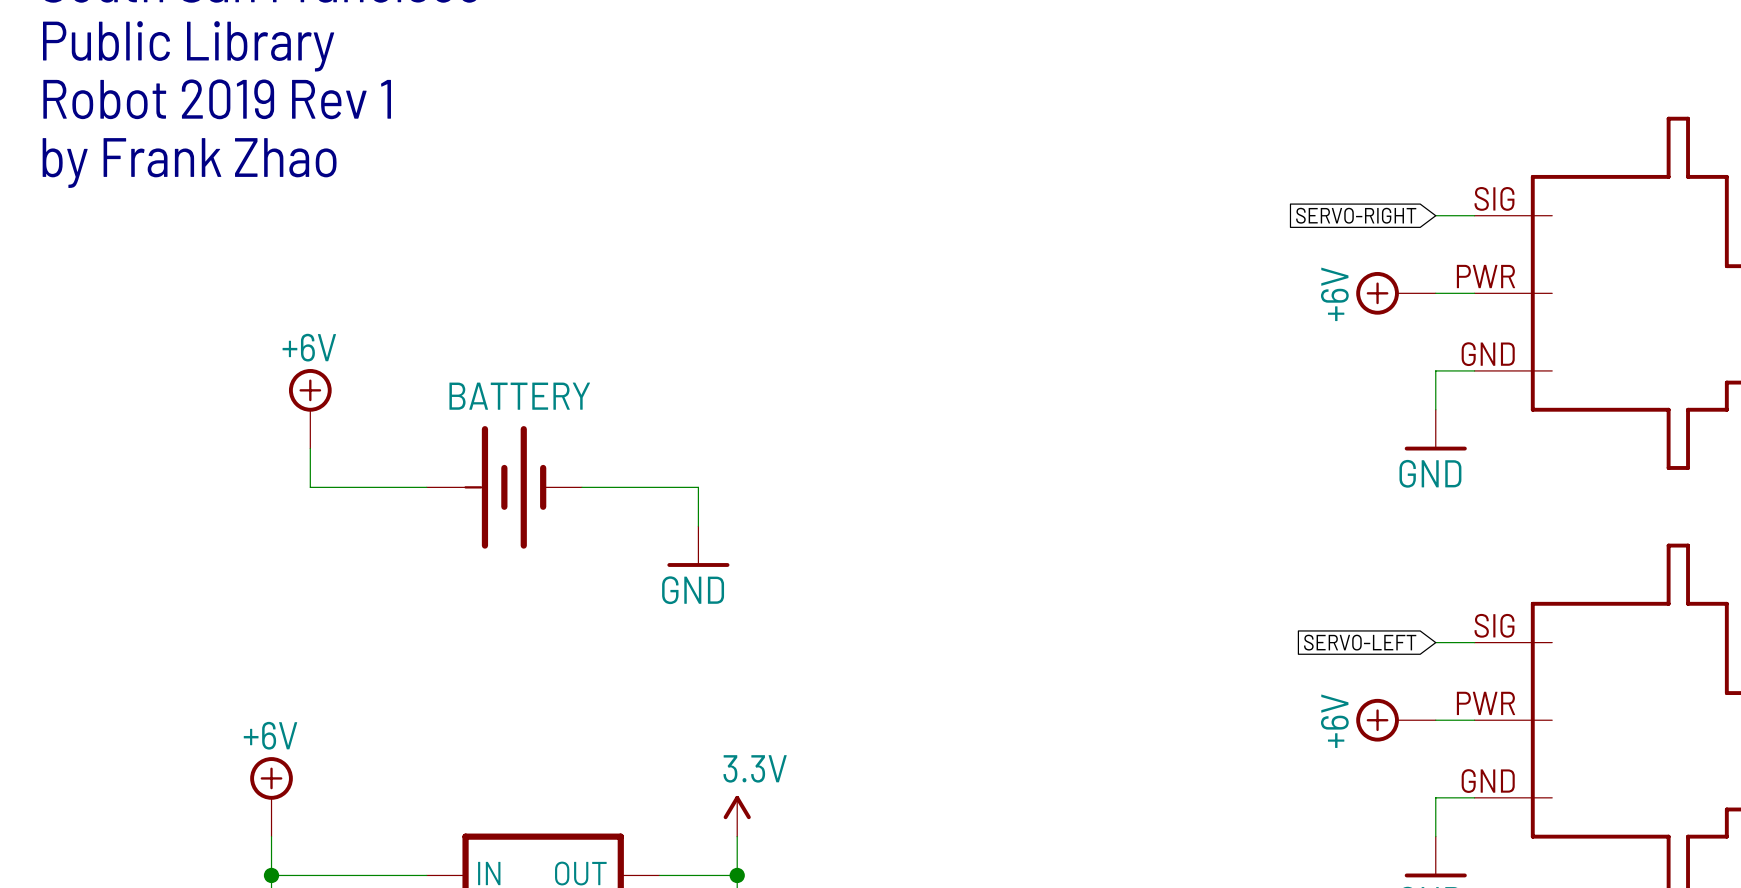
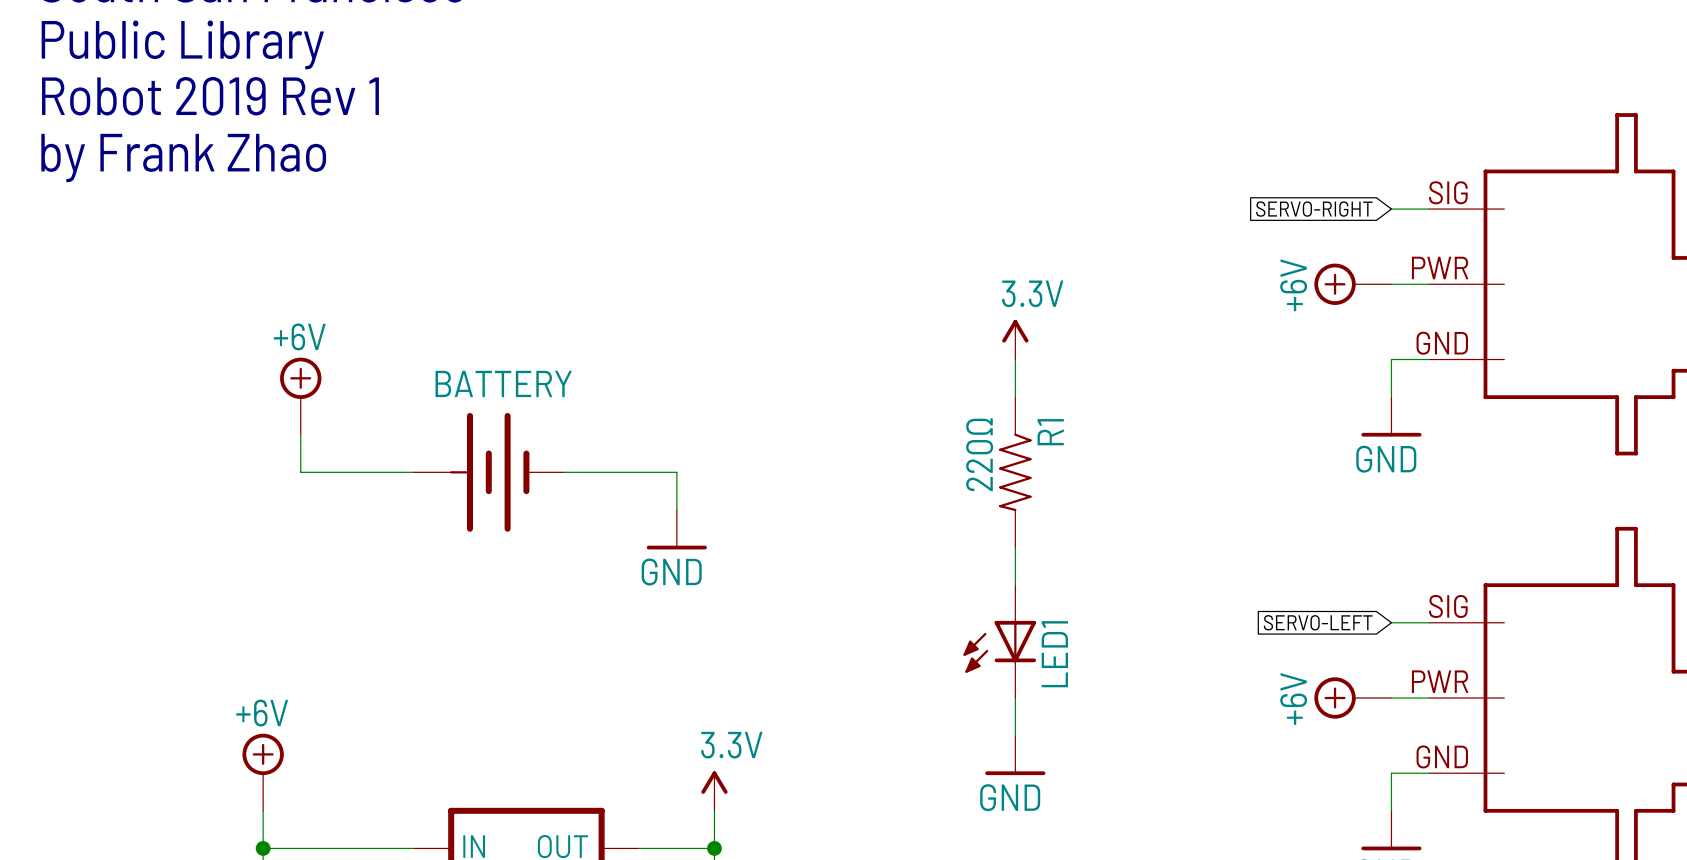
power symbol: none -> 3.3V (1015, 339)
wire: none -> (1015, 359) (1015, 397)
R1: none -> 220Ω (1015, 472)
wire: none -> (1015, 547) (1015, 585)
LED1: none -> (999, 641)
wire: none -> (1015, 697) (1015, 735)
power symbol: none -> GND (1015, 755)

